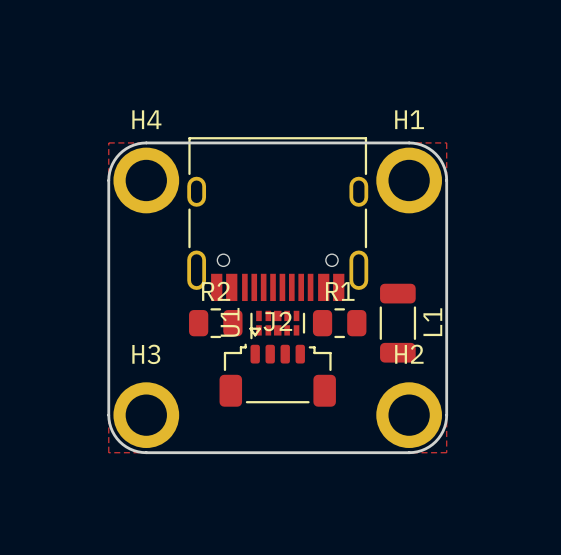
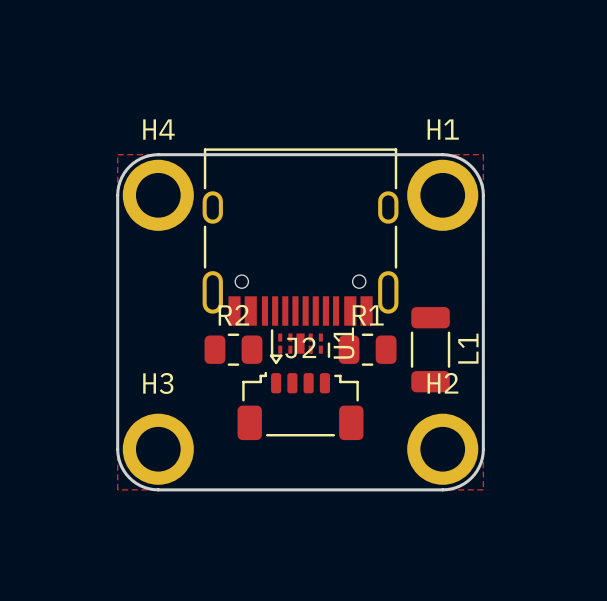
U1 footprint: [250, 310, 306, 340] -> [270, 329, 331, 359]
U1 name position: U1 (230, 322) -> U1 (344, 343)

